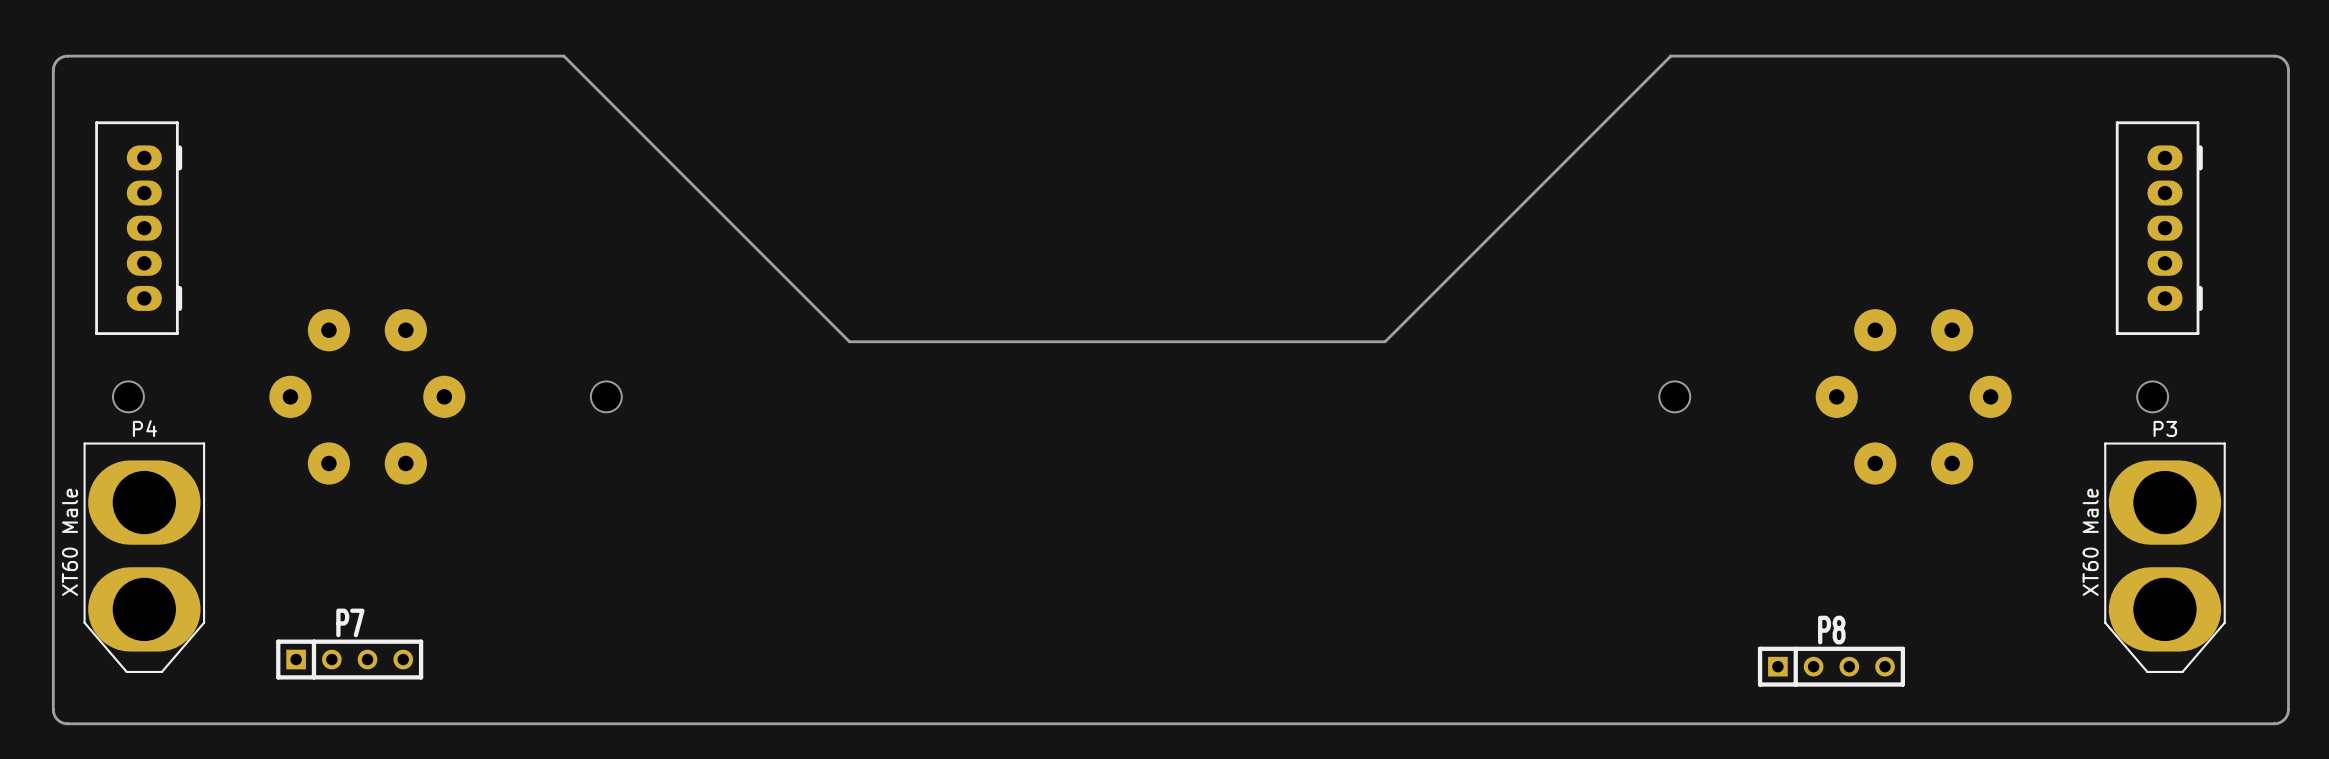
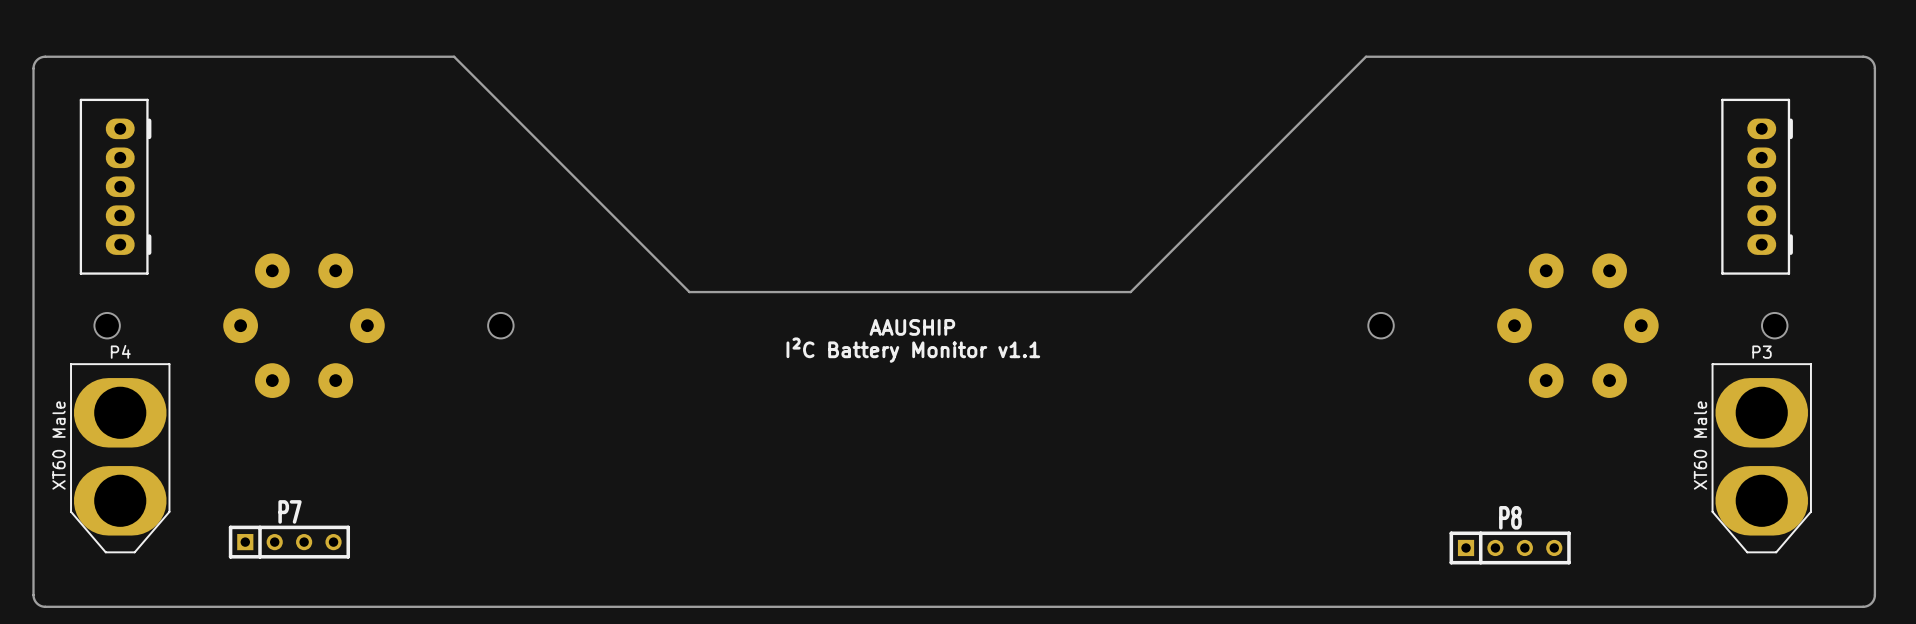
board edge: (1656, 70) (1670, 56) (2274, 56) (2284, 60) (2288, 70) (2288, 709) (2284, 719) (2274, 723) (67, 723) (58, 720) (53, 713) (53, 70) (56, 61) (63, 56) (563, 56) (849, 341) (1385, 341) -> (1366, 56) (1863, 56) (1871, 60) (1874, 68) (1874, 595) (1871, 603) (1863, 606) (45, 606) (38, 604) (33, 598) (33, 68) (35, 61) (42, 57) (454, 56) (689, 292) (1130, 292) (1142, 280)
part position: (2159, 228) -> (1757, 186)
text: none -> AAUSHIP (912, 327)
text: none -> I²C Battery Monitor v1.1 (913, 350)
P3 position: (2164, 557) -> (1761, 458)

